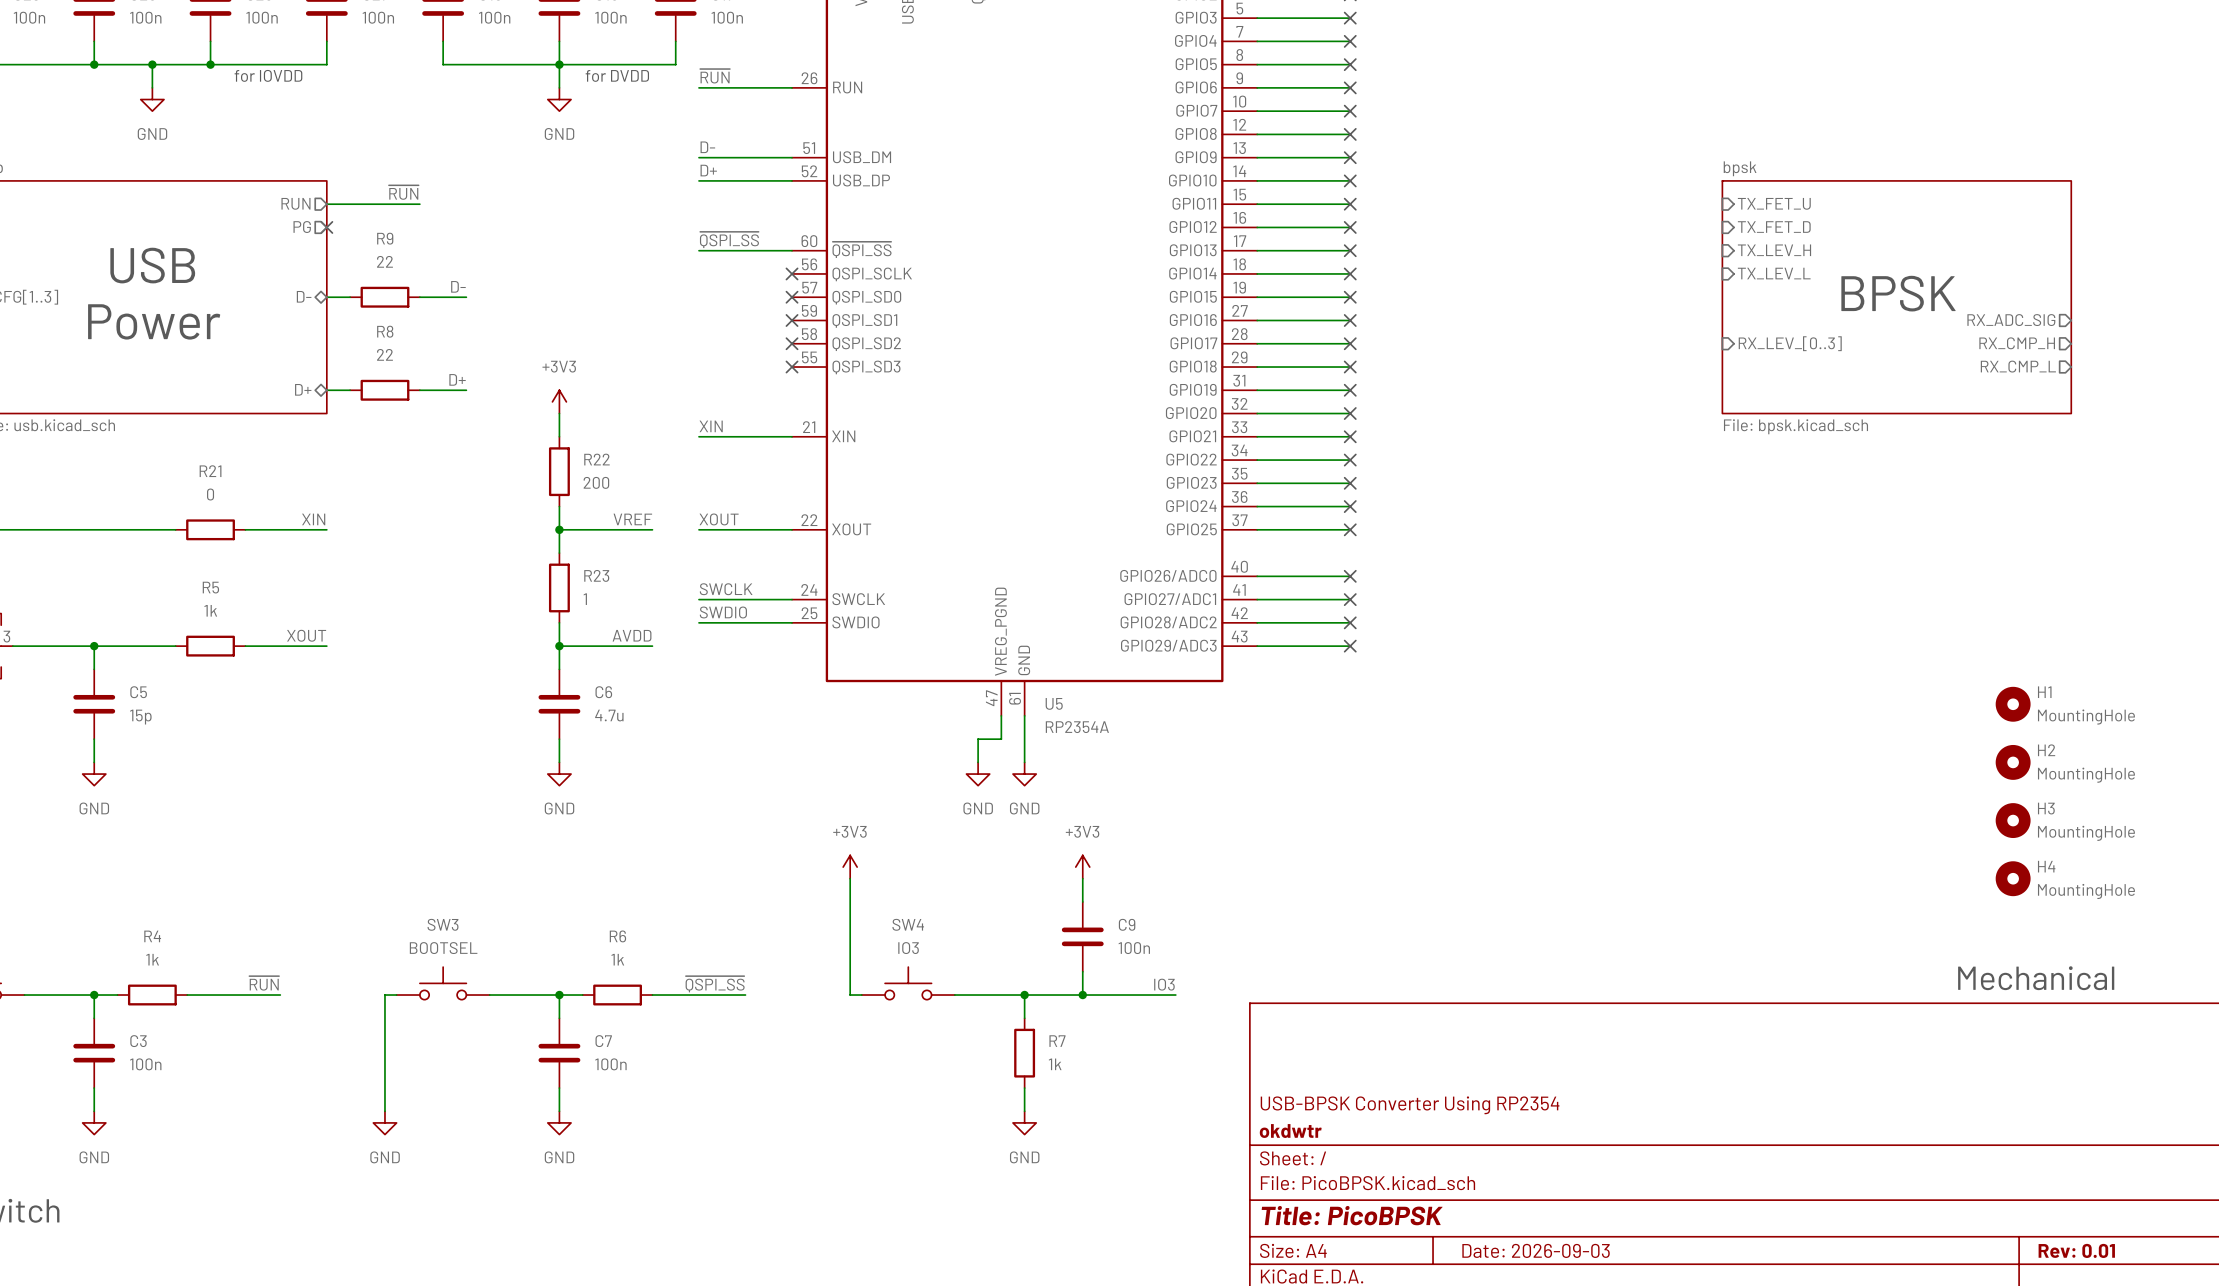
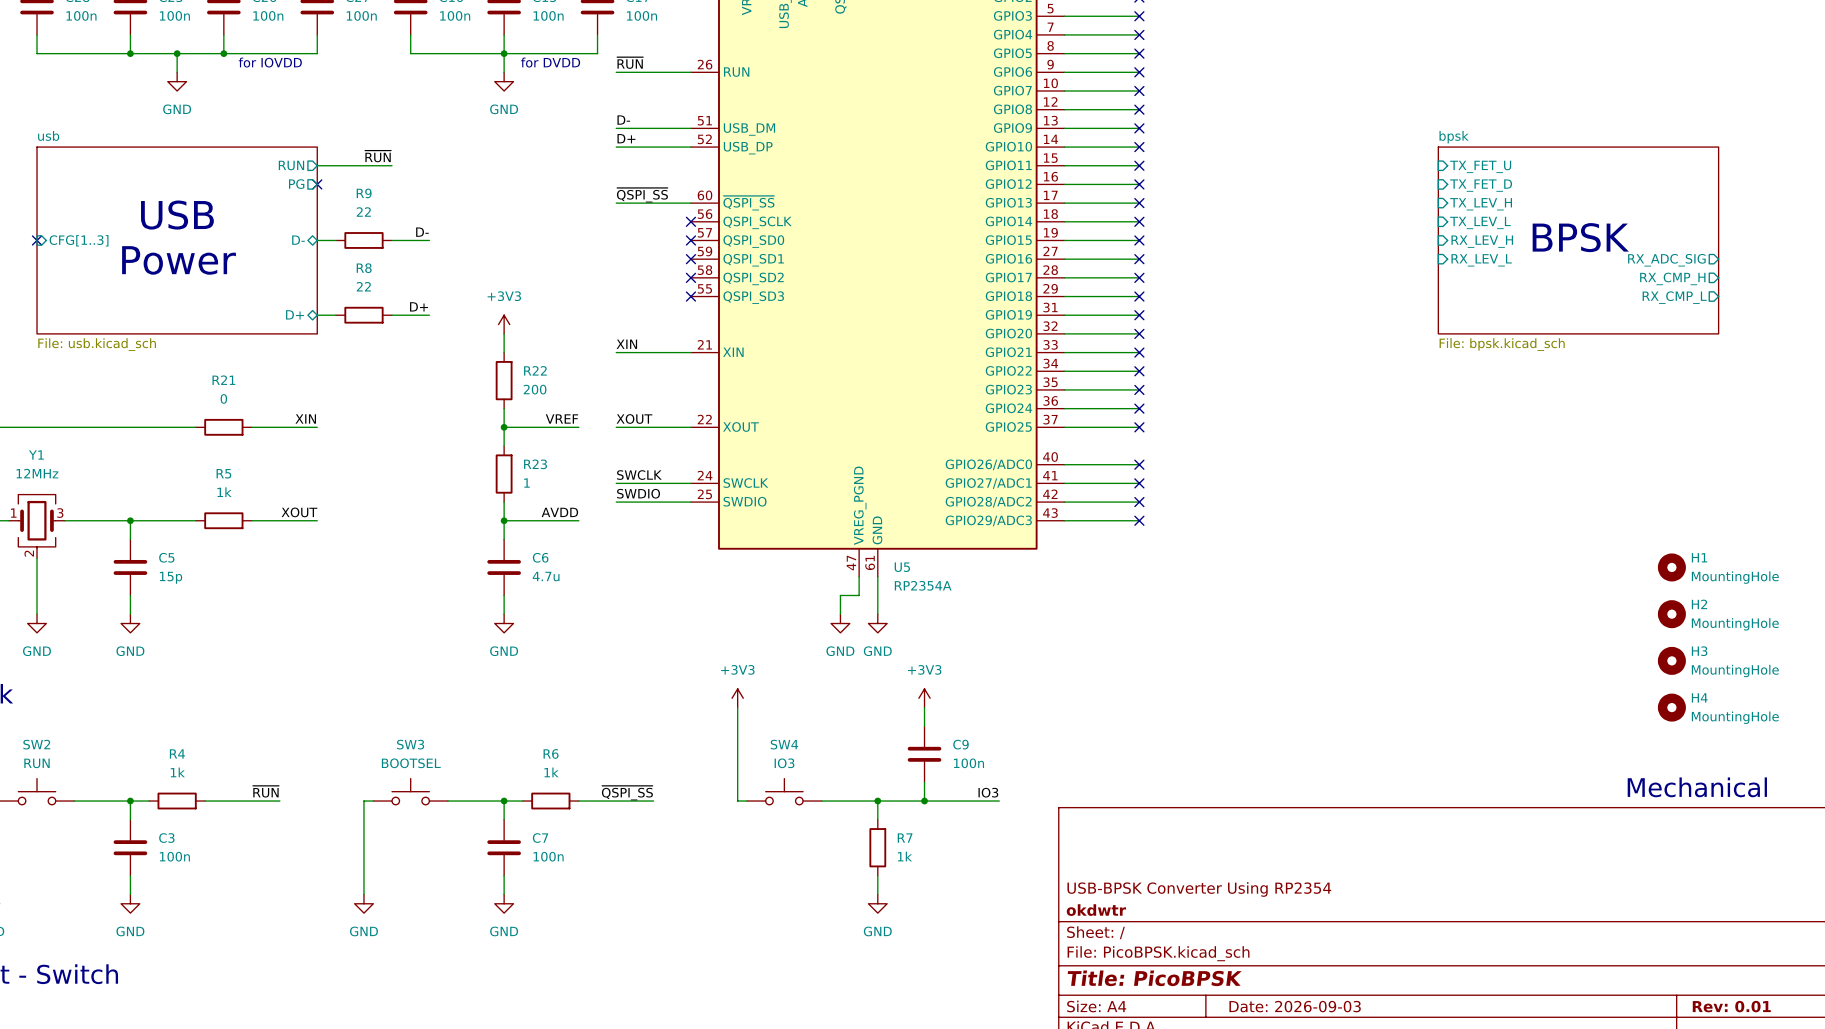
sheet pin: none -> RX_LEV_H (1482, 241)
sheet pin: RX_LEV_[0..3] (1790, 343) -> RX_LEV_L (1481, 260)

